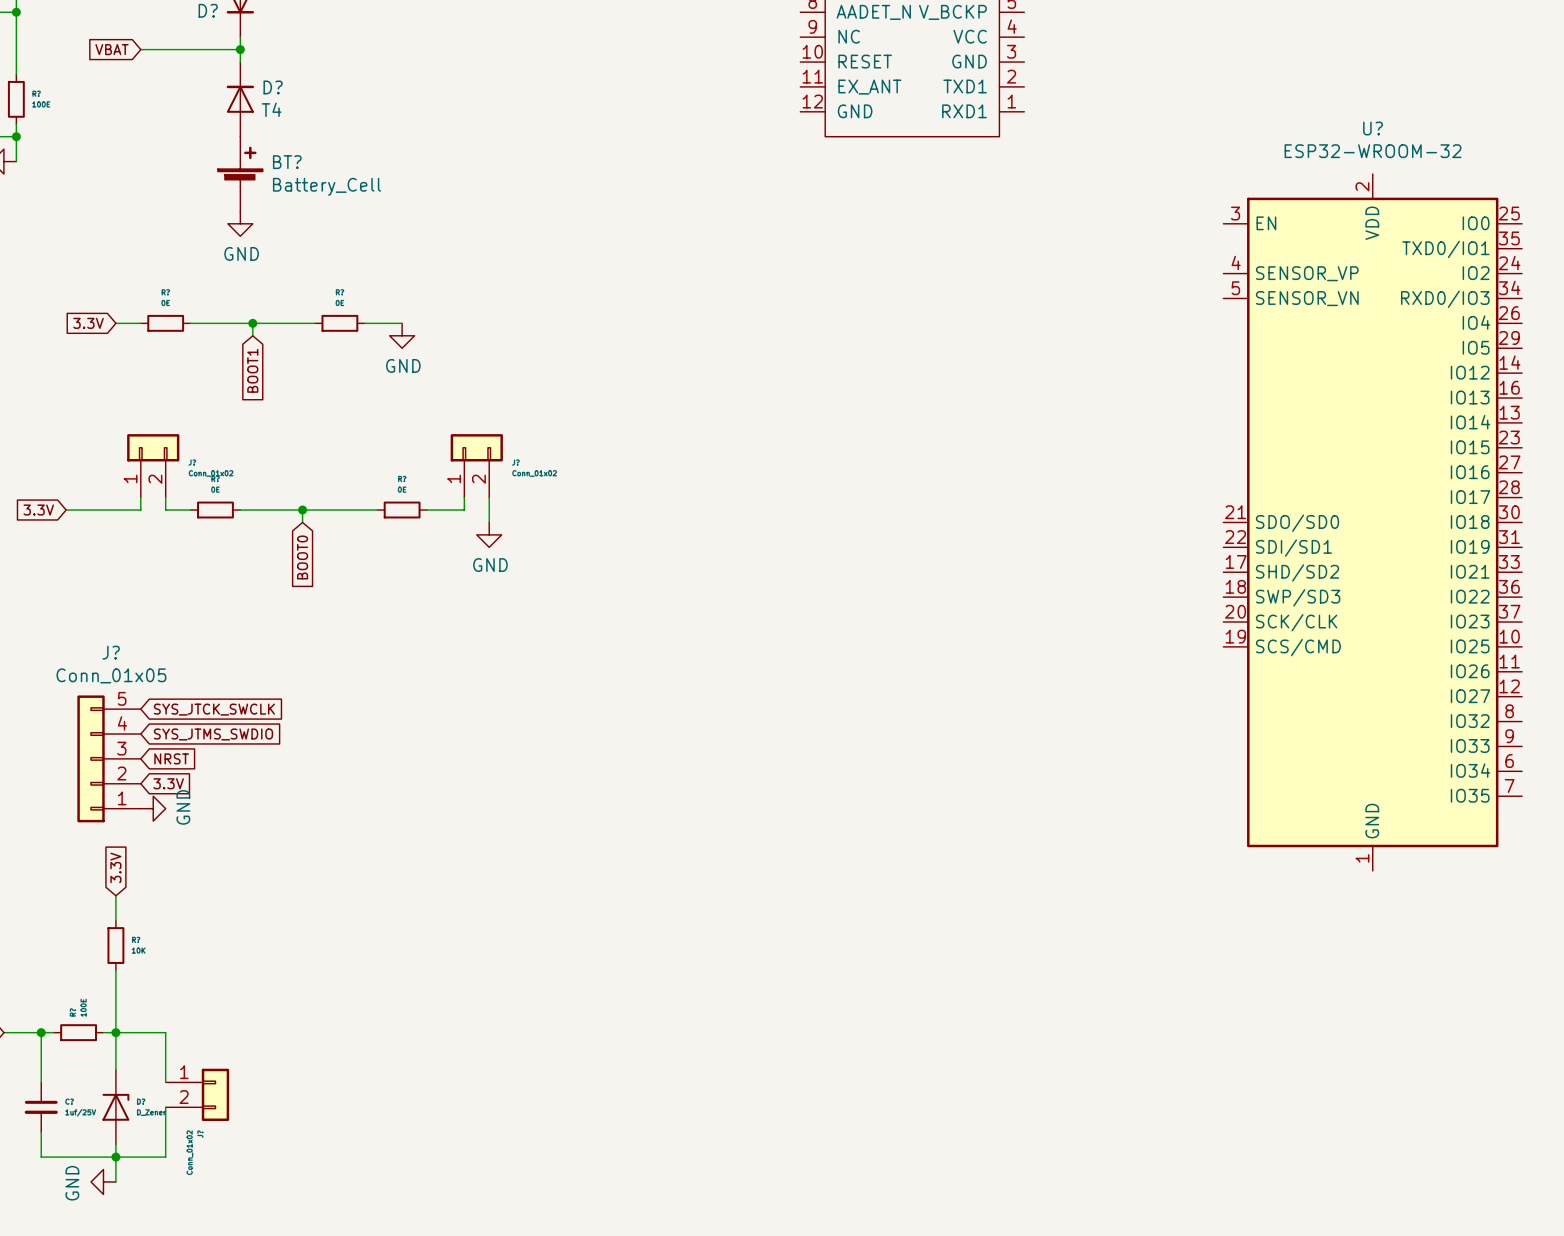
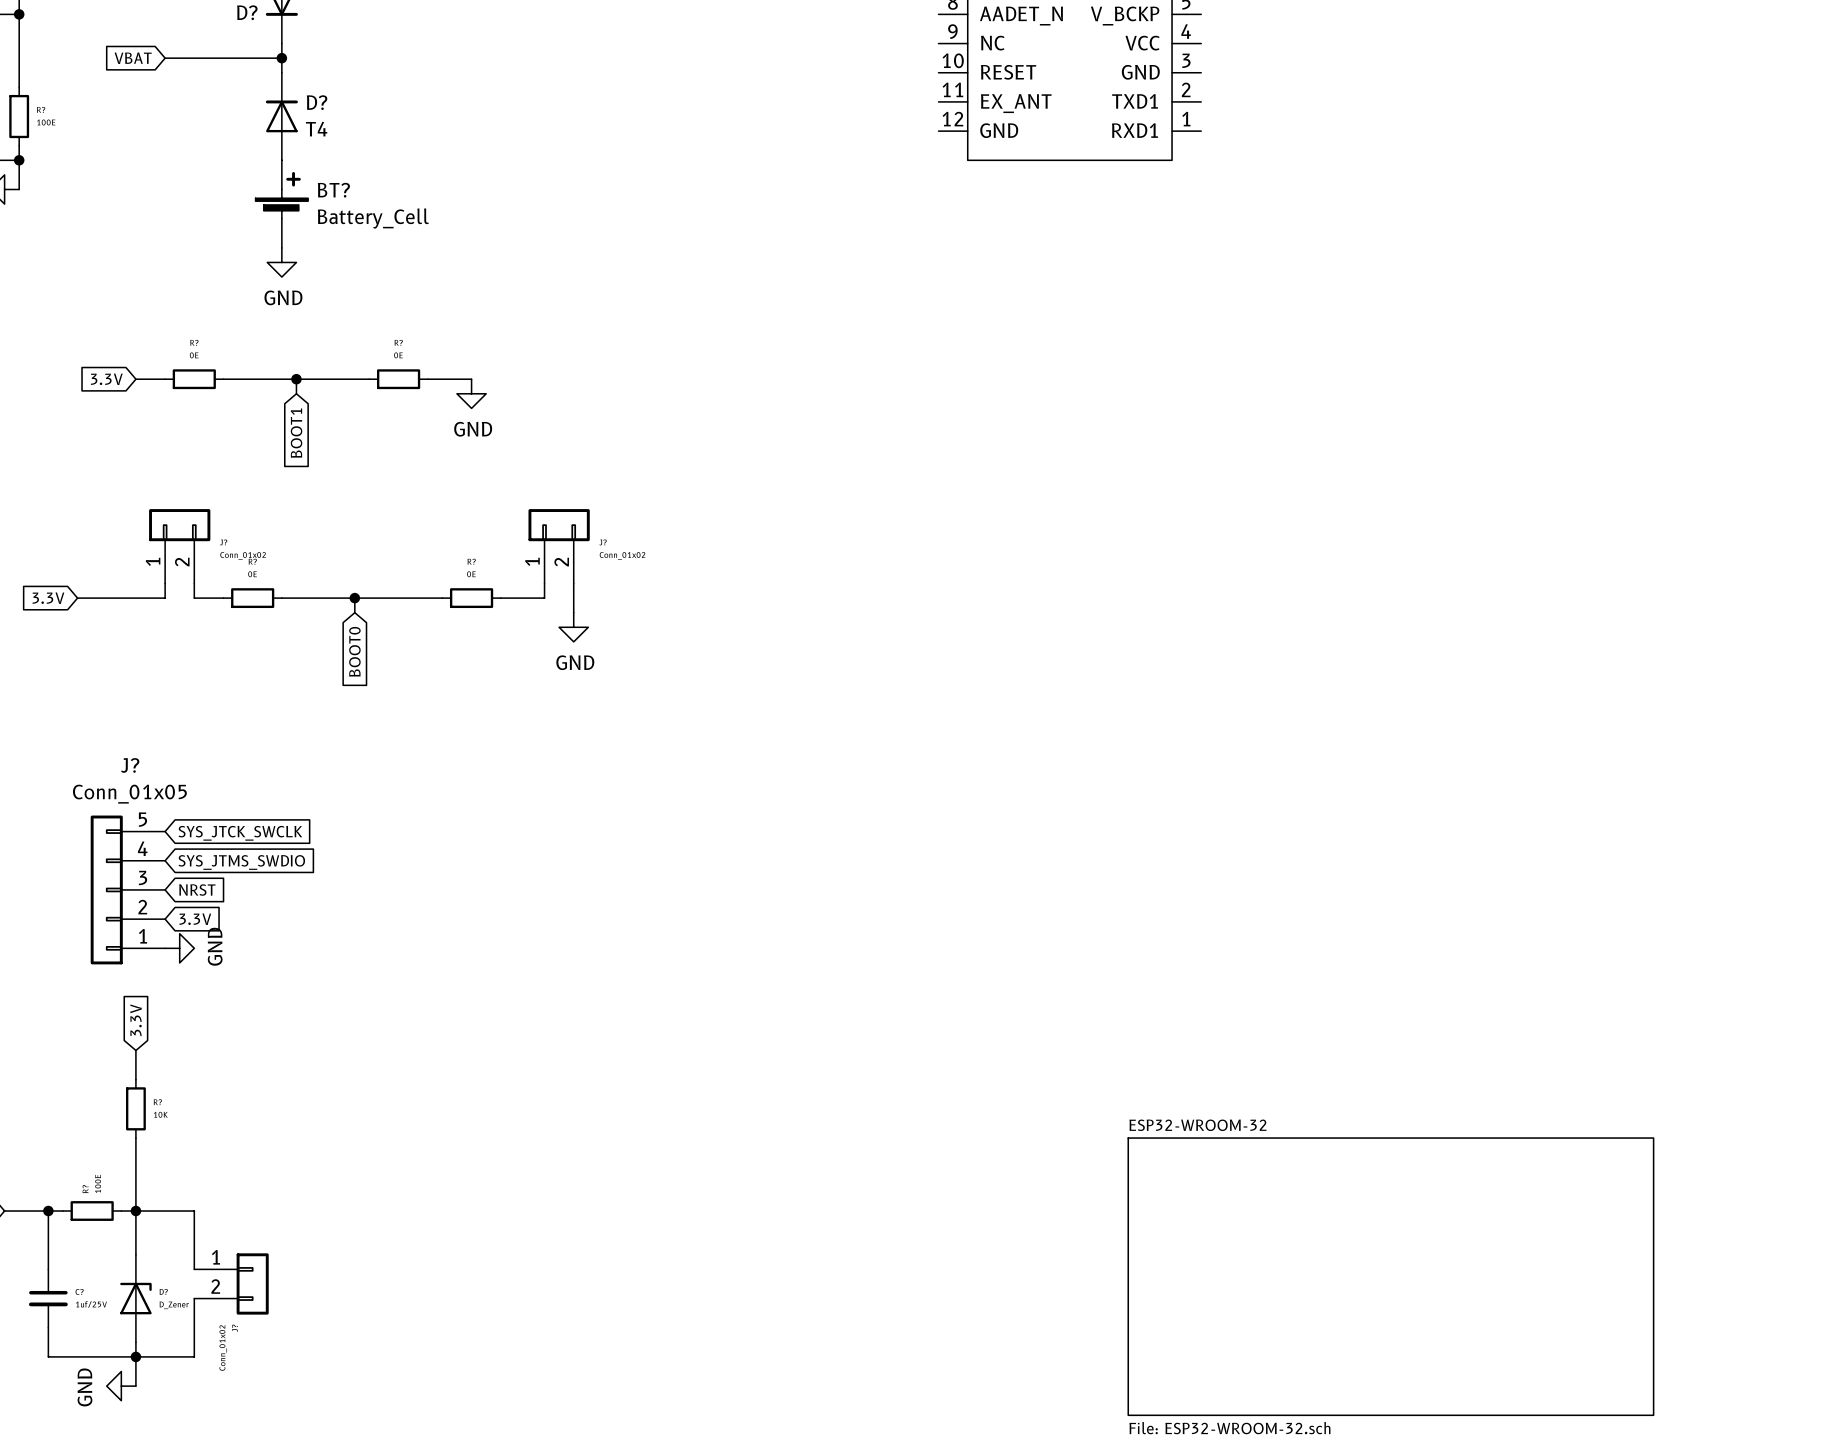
U?: ESP32-WROOM-32 (1372, 522) -> none
sheet ESP32-WROOM-32: none -> File: ESP32-WROOM-32.sch (1390, 1276)

